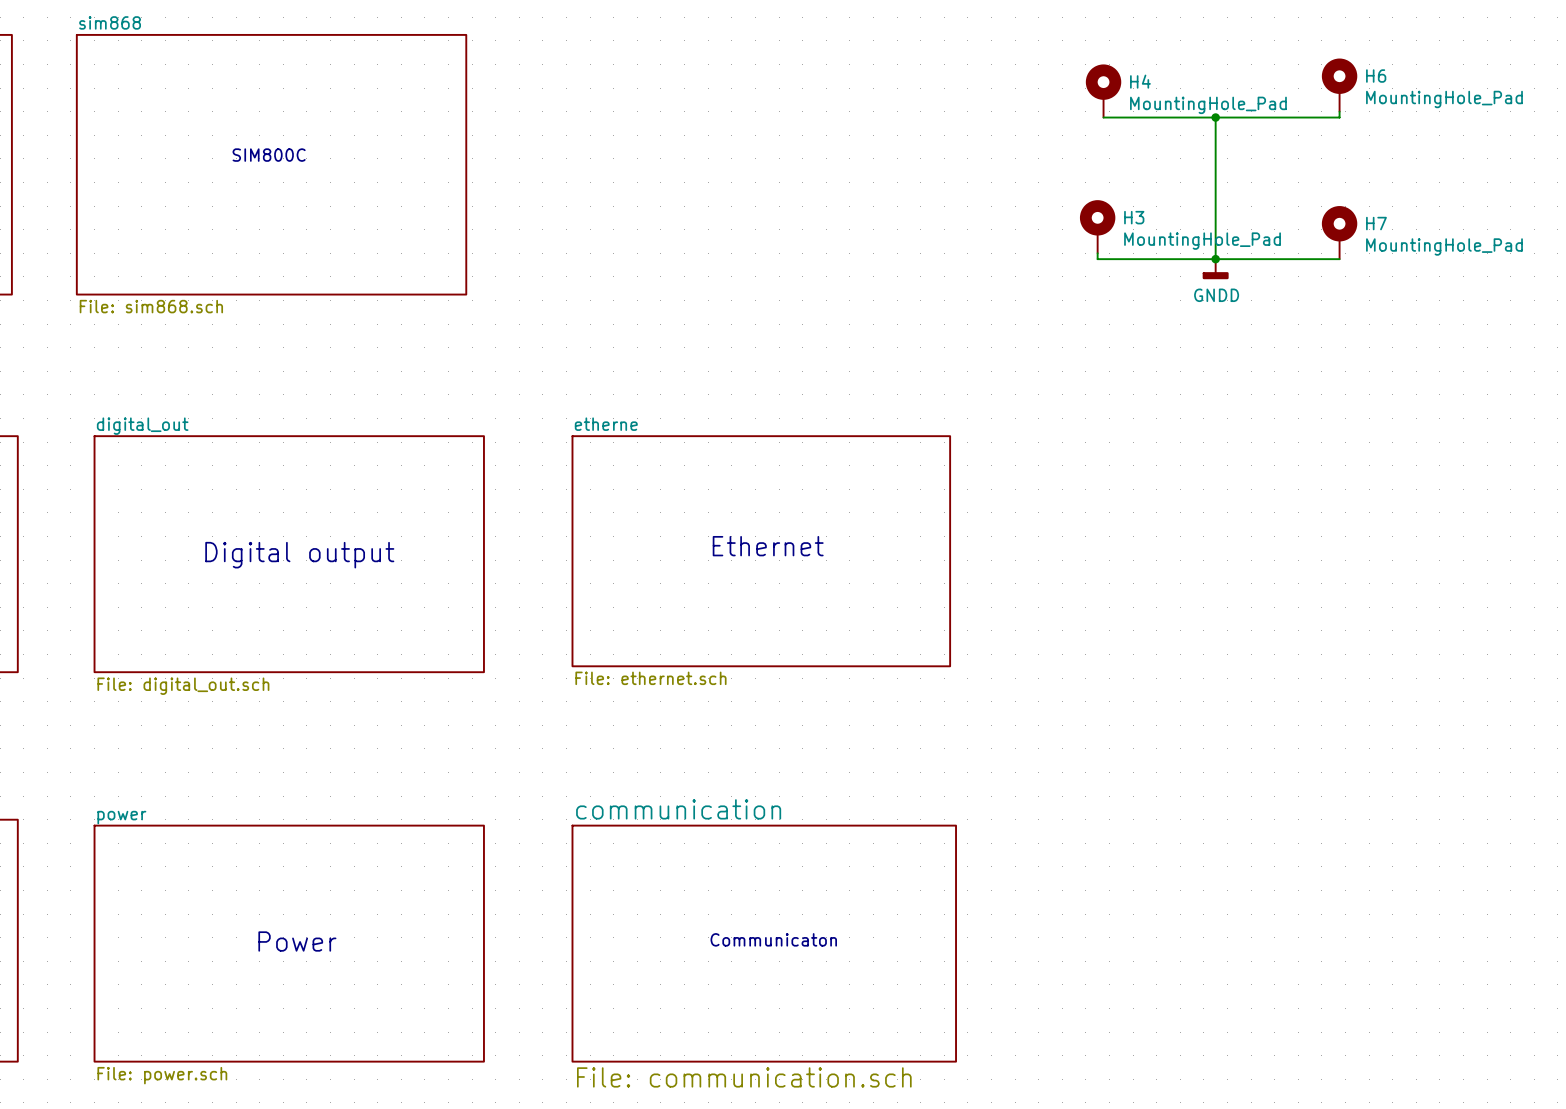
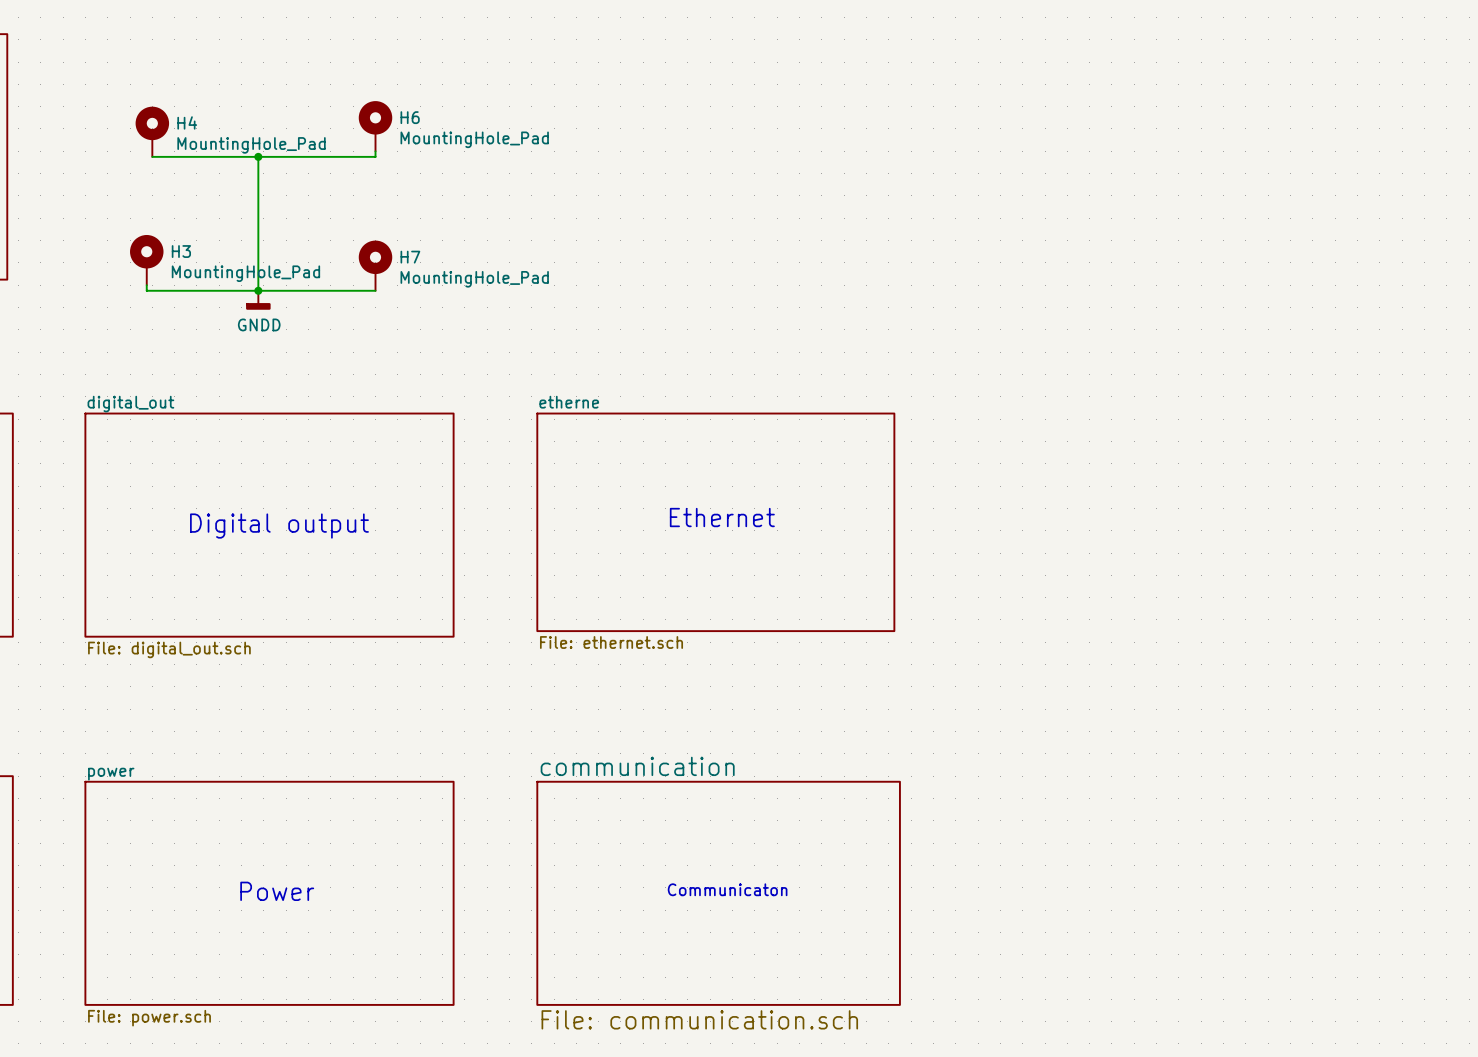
H6 position: (1339, 85) -> (375, 126)
H4 position: (1103, 90) -> (152, 131)
wire: (1339, 111) (1339, 117) (1103, 117) -> none
wire: (1215, 117) (1215, 259) -> none
junction: (1215, 117) -> none
text: SIM800C (269, 155) -> none
wire: none -> (375, 151) (375, 156) (152, 156)
sheet sim868: File: sim868.sch (271, 164) -> none
wire: none -> (258, 156) (258, 290)
junction: none -> (258, 156)
H3 position: (1097, 226) -> (146, 260)
H7 position: (1339, 232) -> (375, 265)
wire: (1097, 253) (1097, 259) (1339, 259) -> none
junction: (1215, 259) -> none
power symbol: GNDD (1215, 269) -> none
wire: none -> (146, 285) (146, 290) (375, 290)
junction: none -> (258, 290)
power symbol: none -> GNDD (258, 300)

